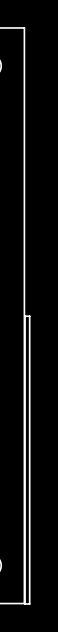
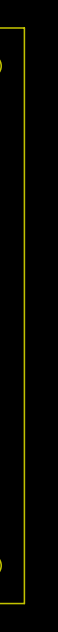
board edge: (29, 316) (29, 604) (24, 604) (24, 316) (29, 316) -> none

